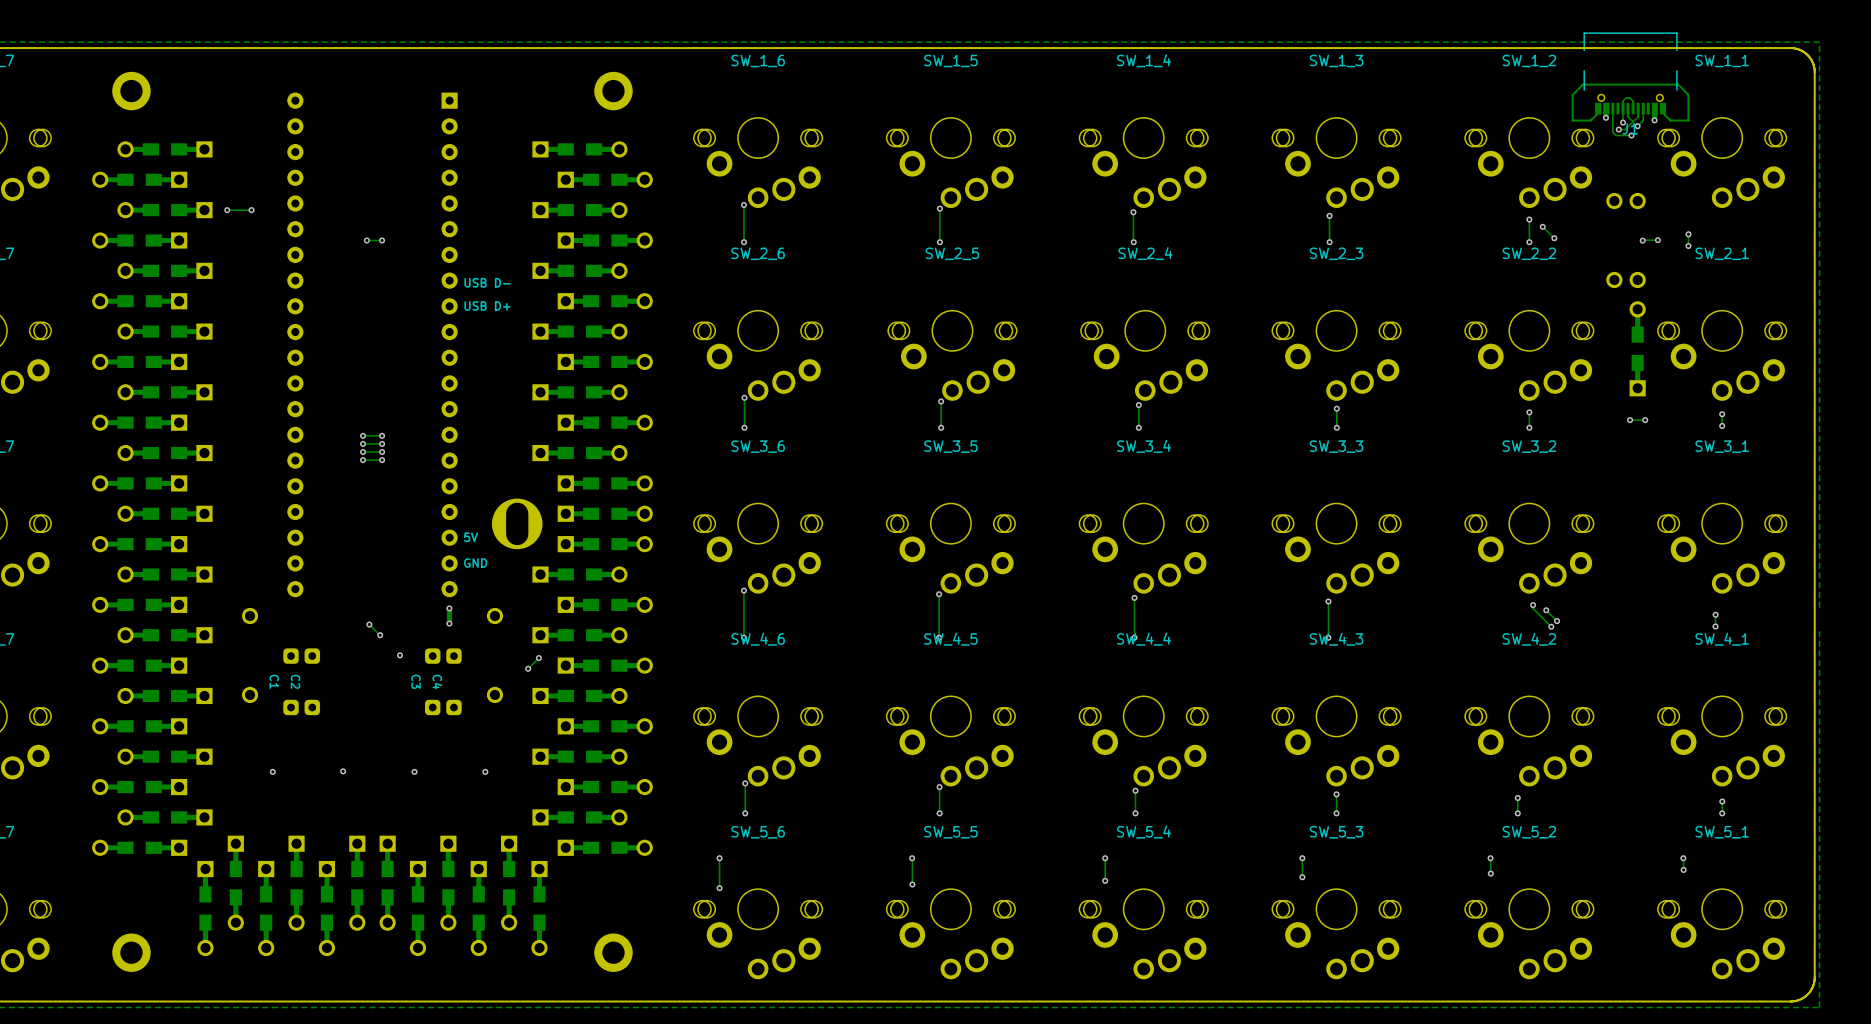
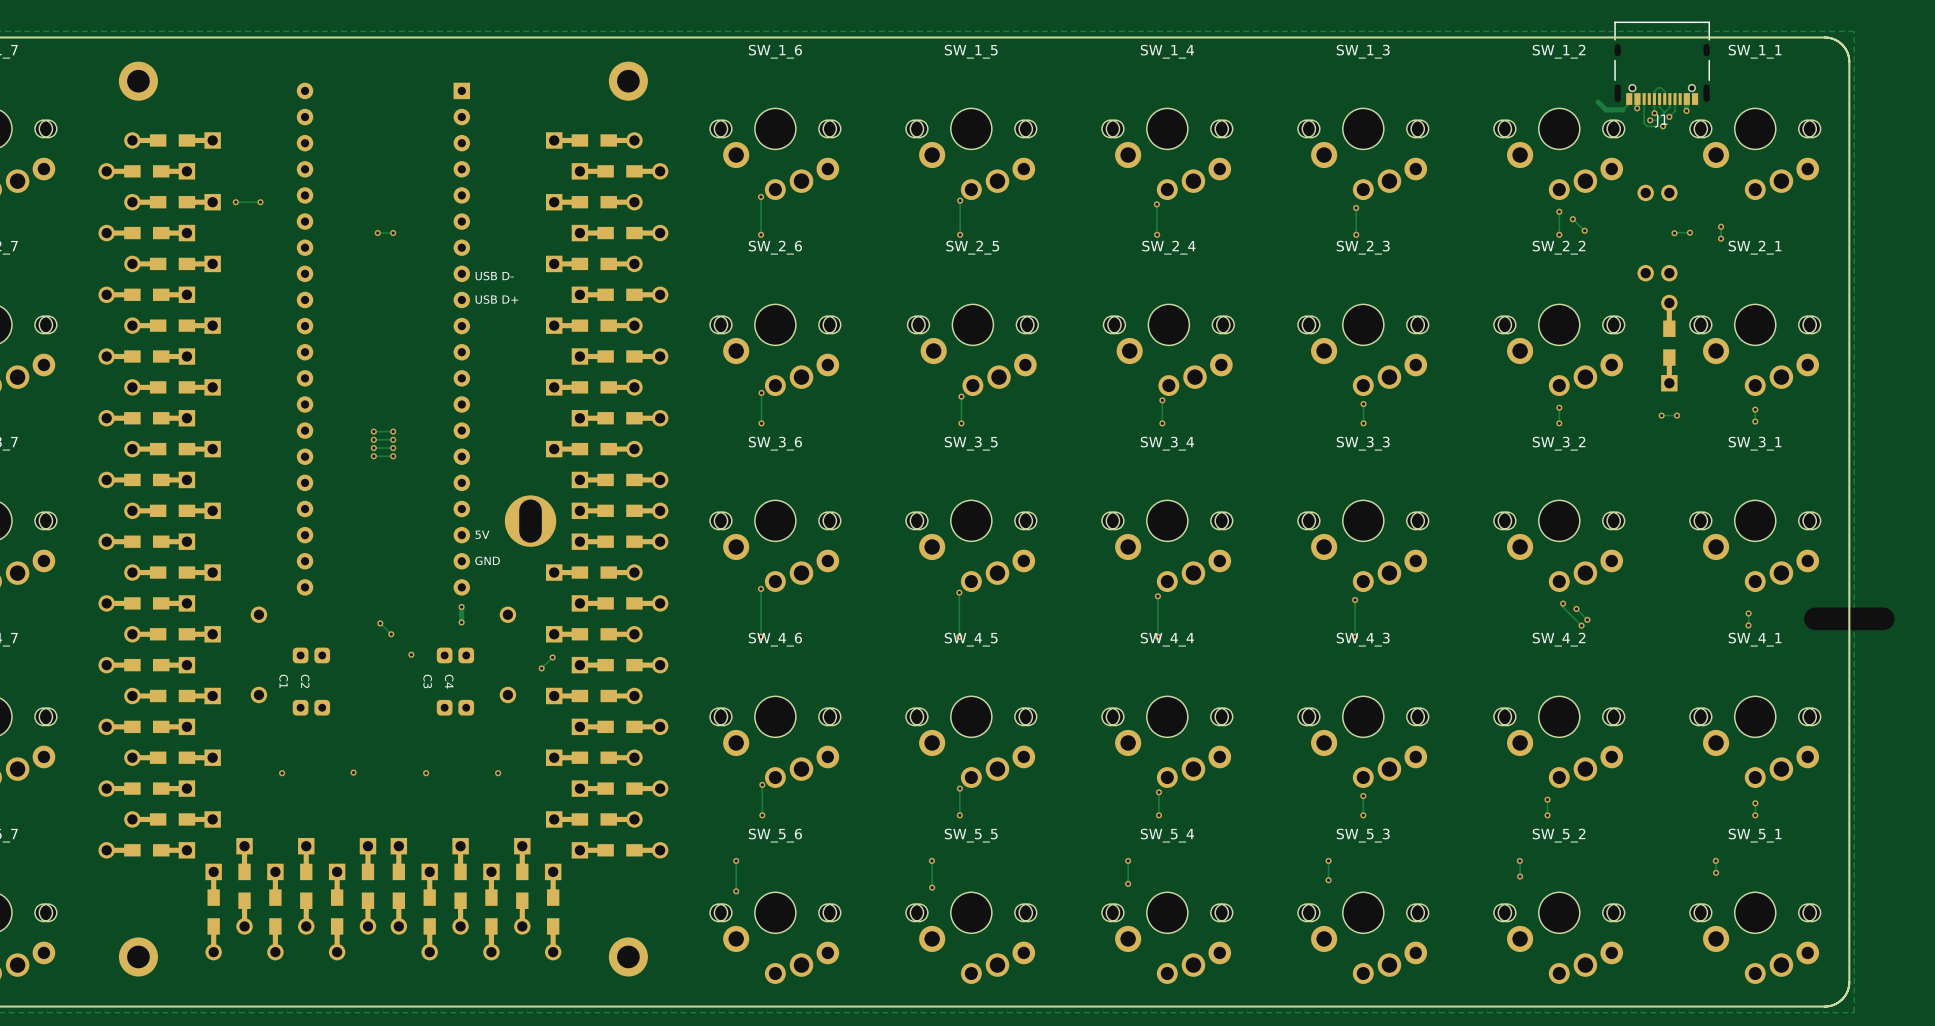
track: (1664, 112) (1670, 120) (1688, 120) (1688, 94) (1678, 84) (1583, 84) (1572, 94) (1572, 120) (1592, 119) -> (1598, 102) (1605, 109) (1622, 109)

